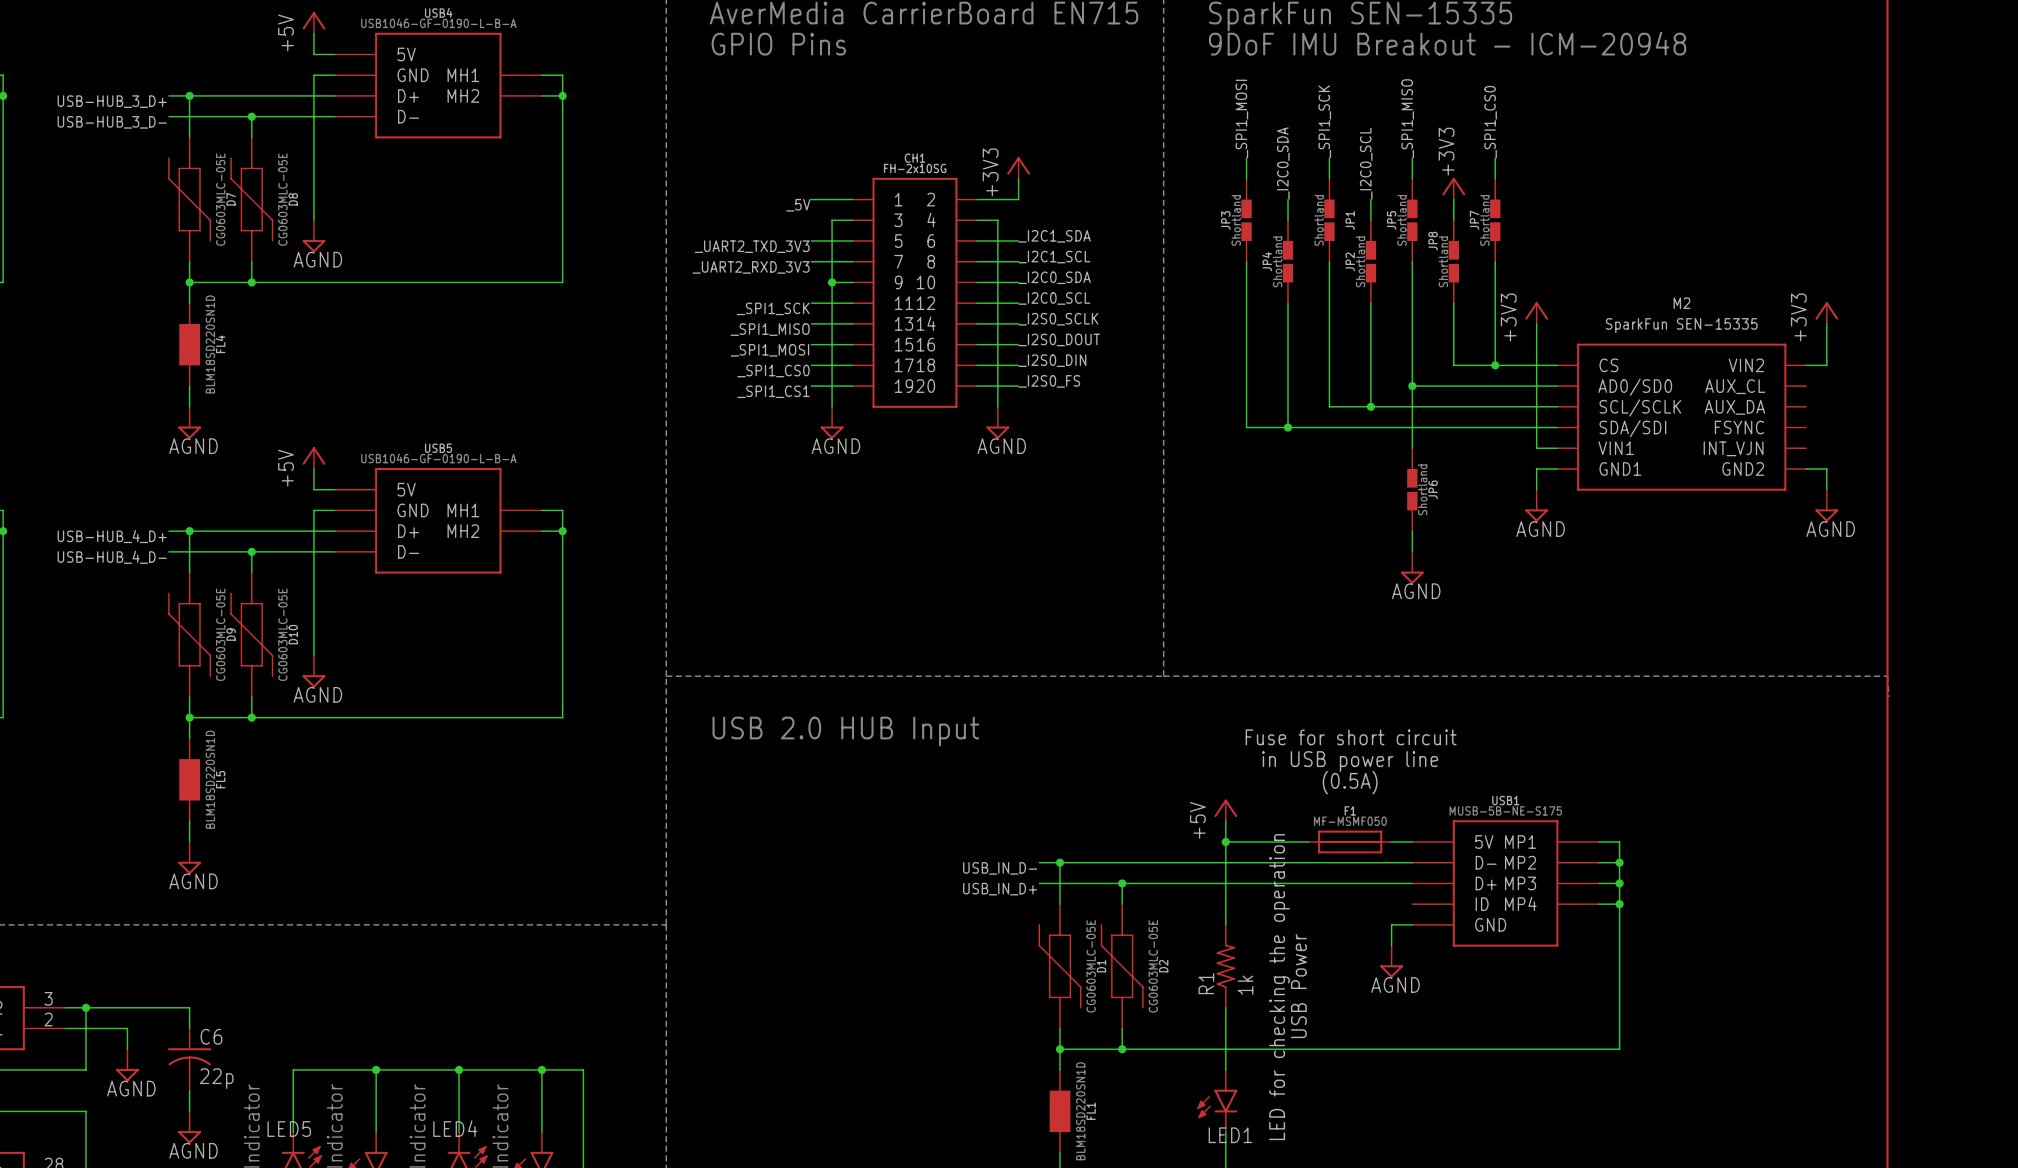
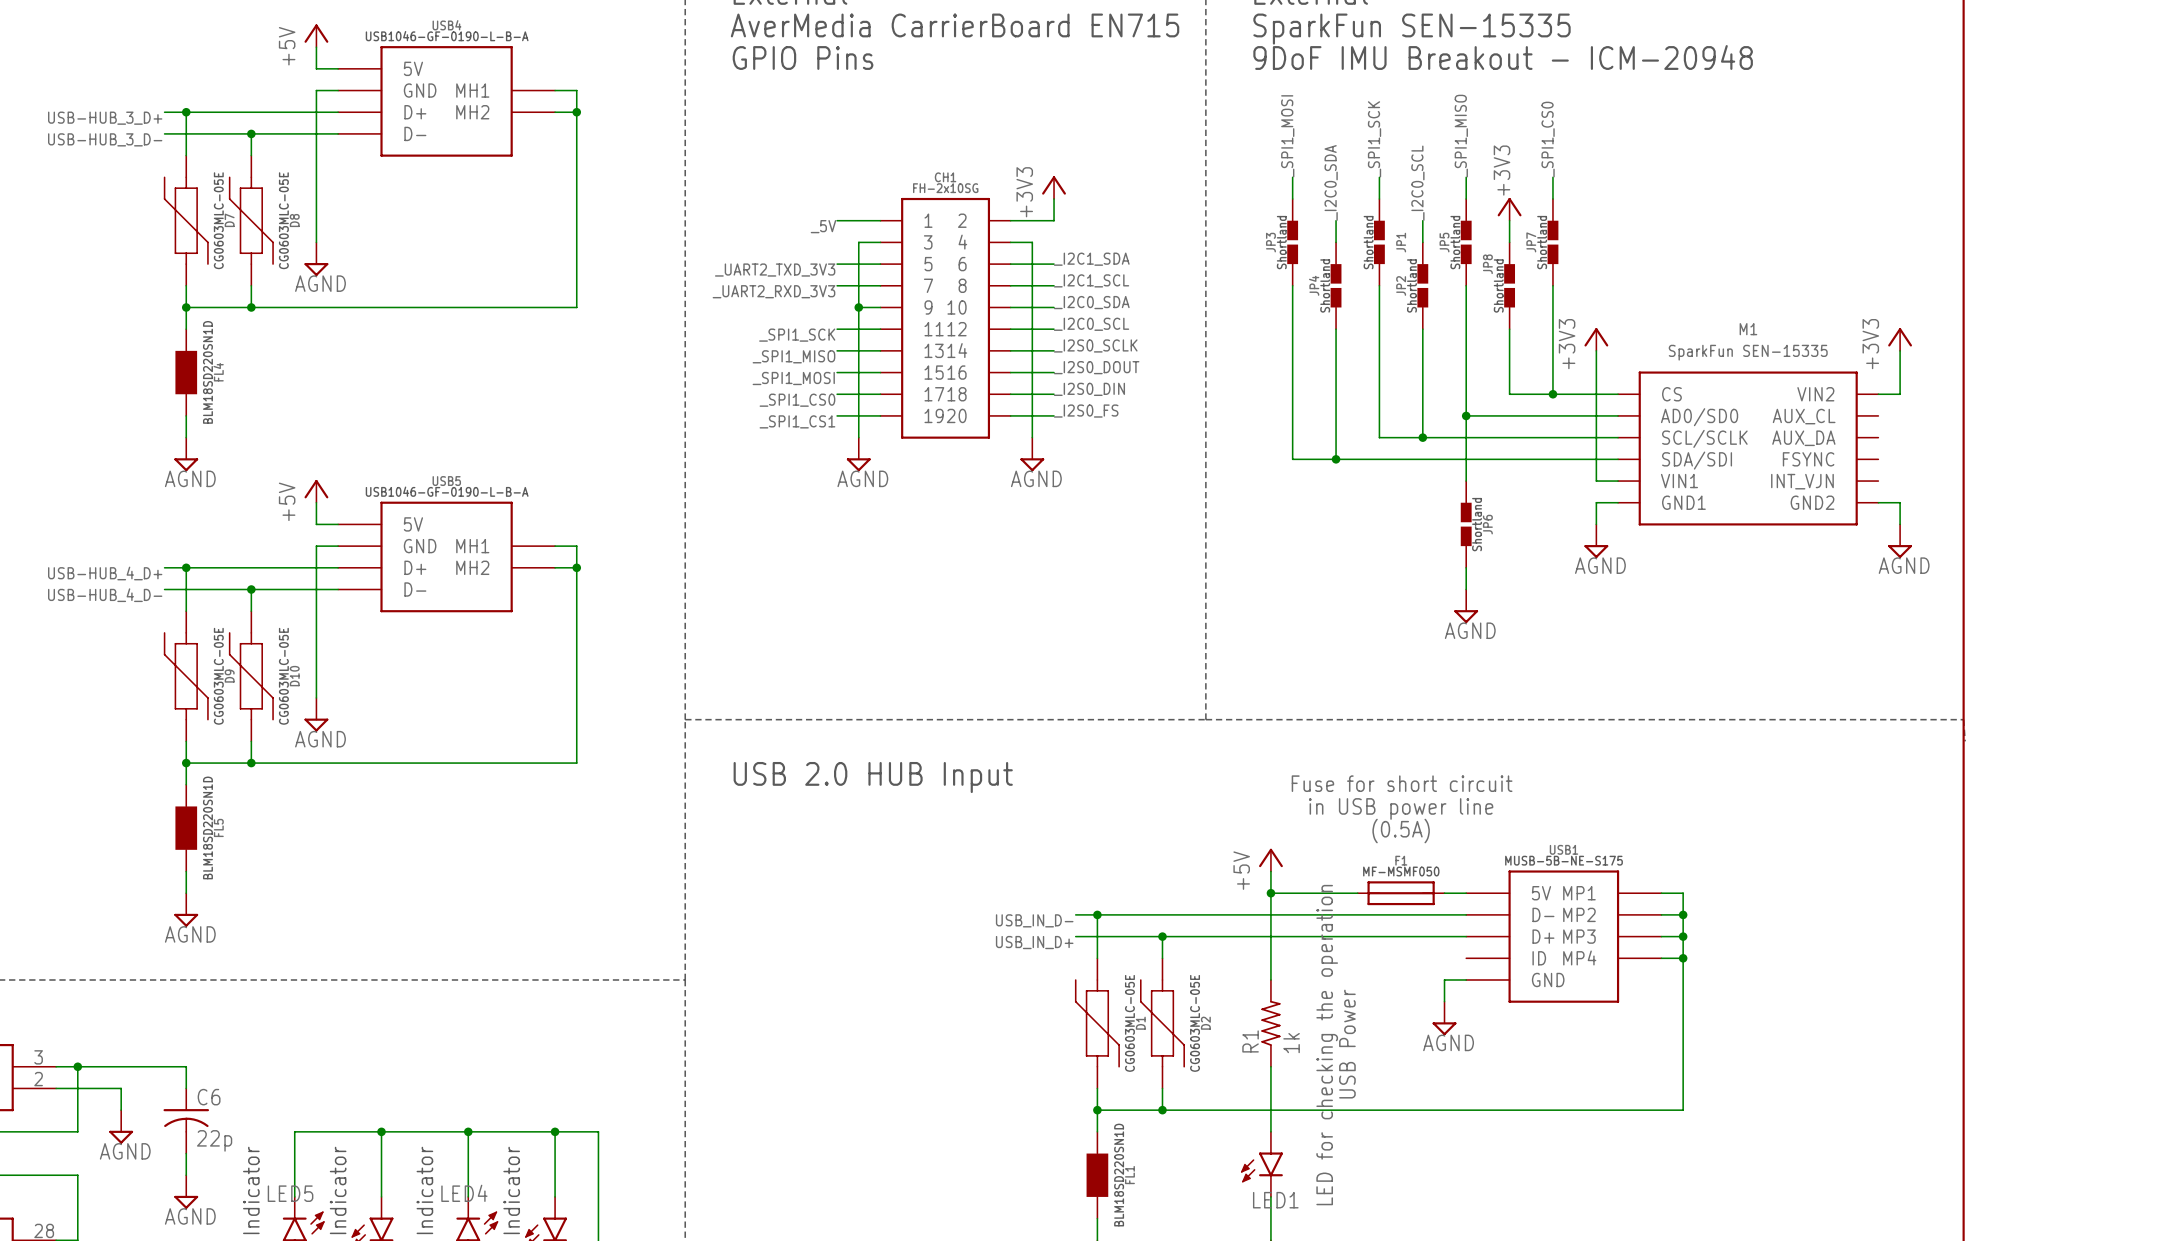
M2 name: M2 (1681, 303) -> M1 (1748, 329)

